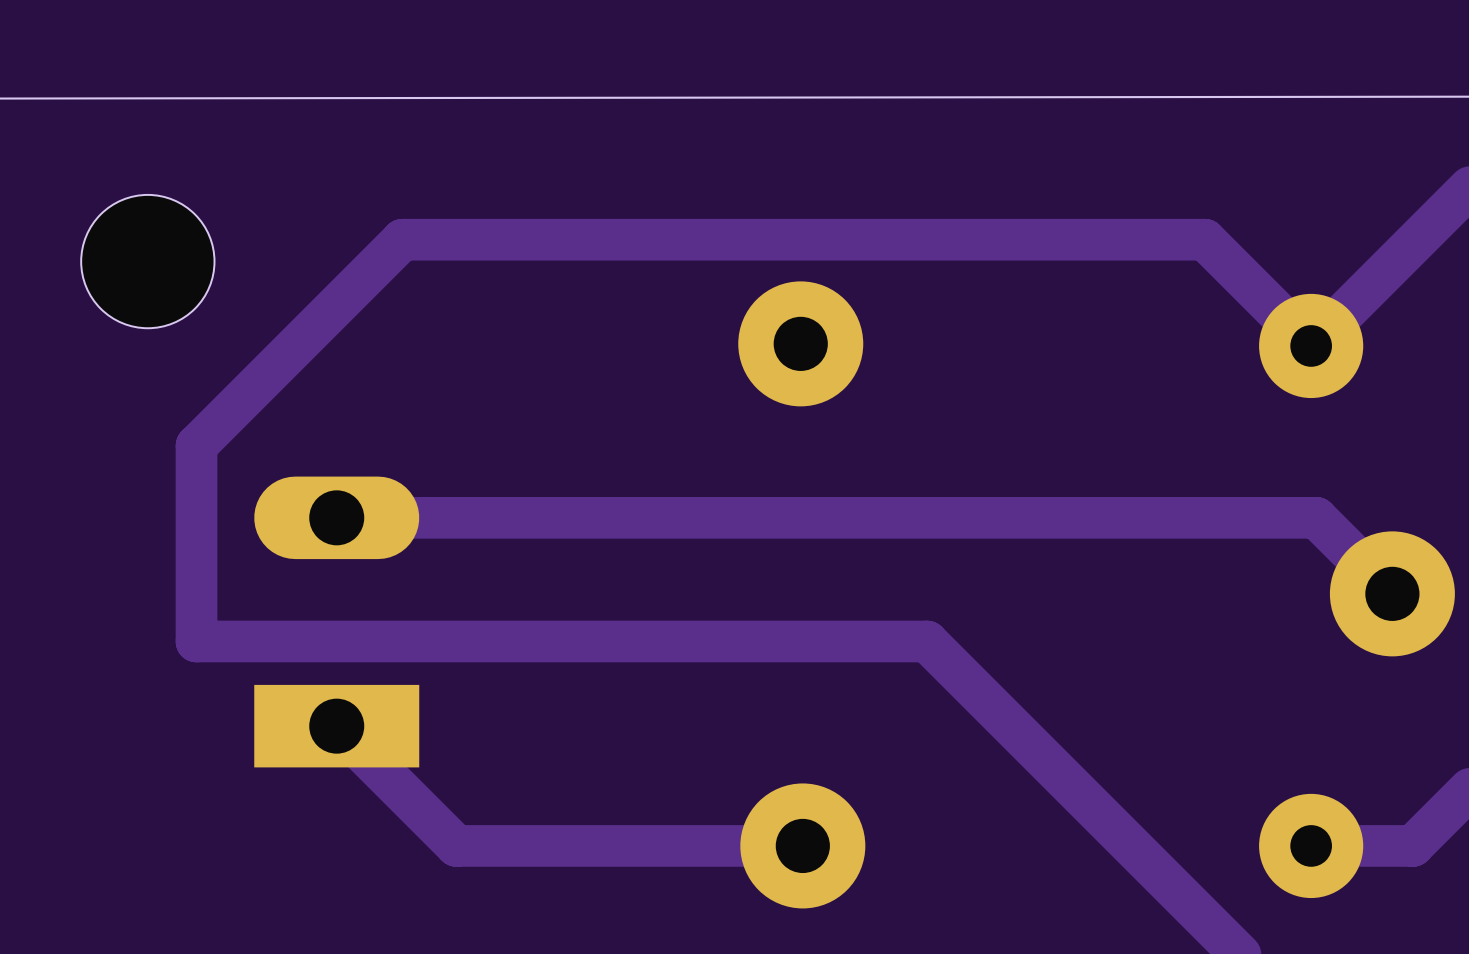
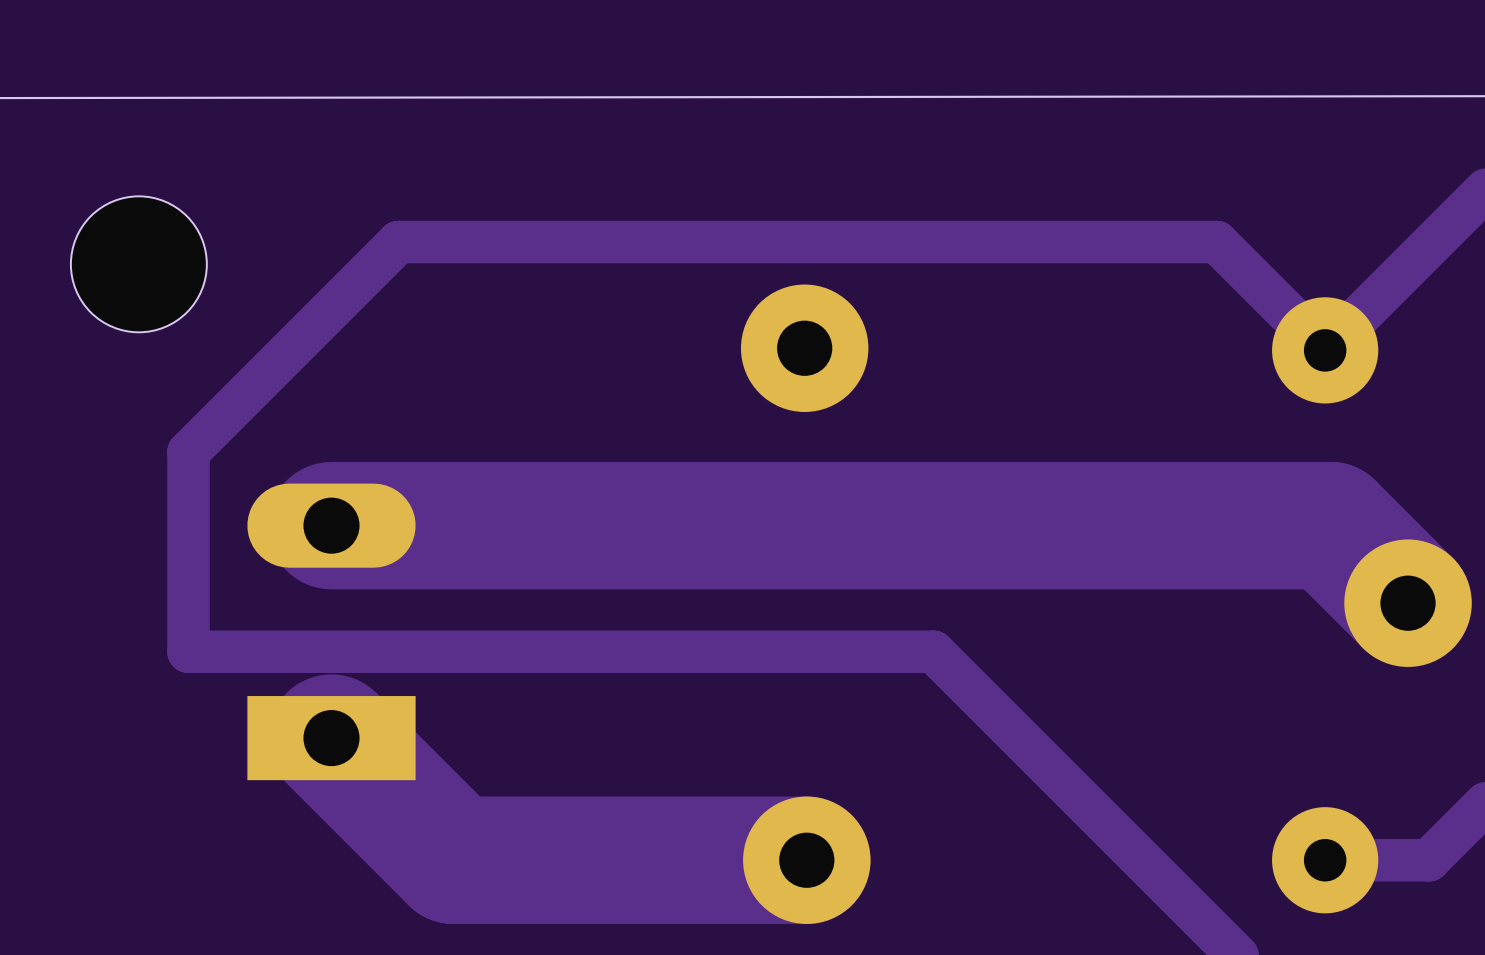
track width: thin (336, 517) (1316, 517) (1392, 593) -> thick (331, 525) (1330, 525) (1408, 603)
track width: thin (336, 726) (456, 845) (802, 845) -> thick (331, 738) (453, 860) (806, 860)

